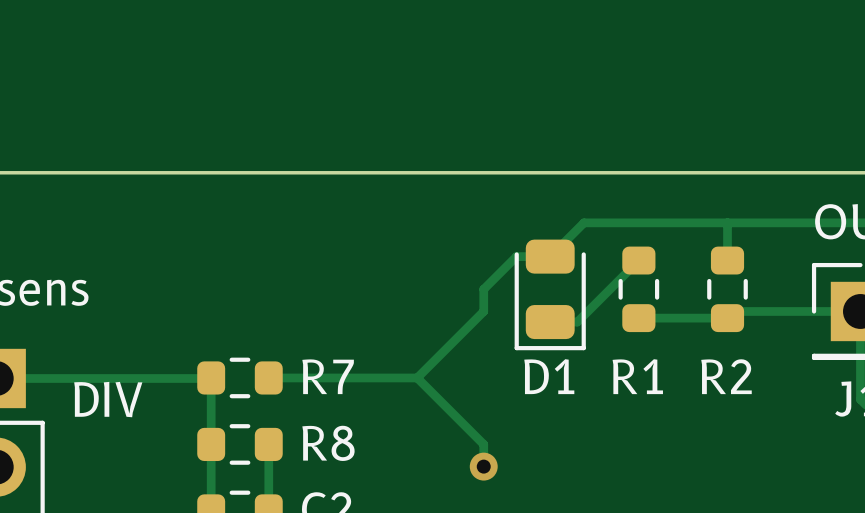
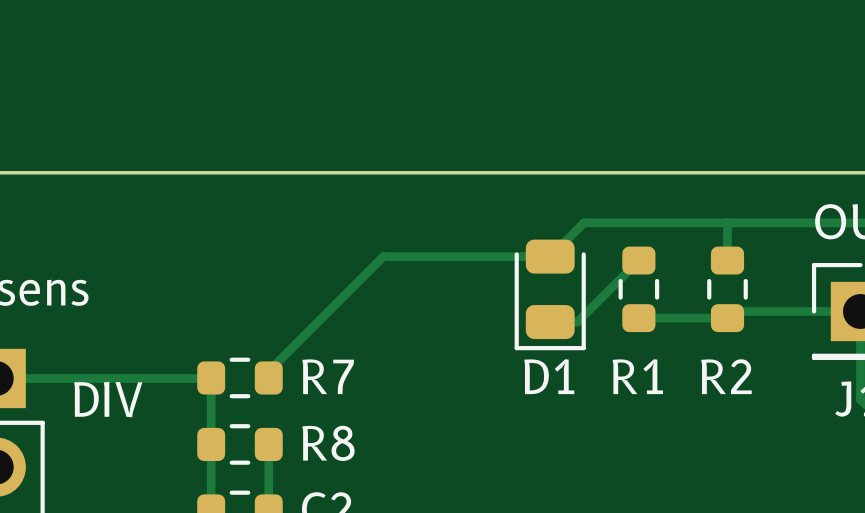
track: (516, 256) (483, 289) (483, 311) (417, 377) -> (516, 256) (383, 256) (268, 371) (268, 377)
track: (268, 377) (417, 377) -> none
track: (417, 377) (483, 444) (483, 466) -> none
via: (483, 466) -> none

